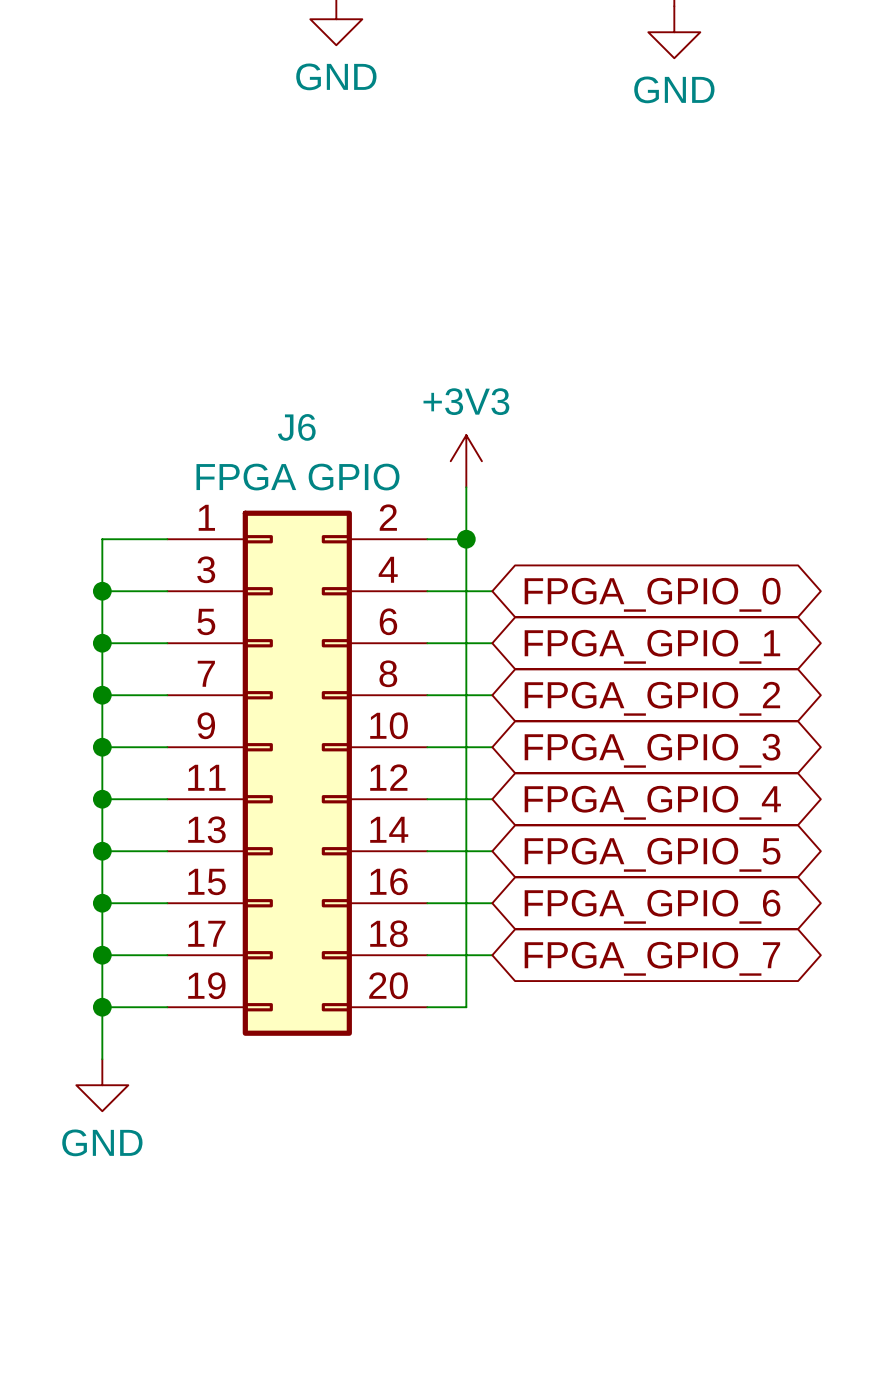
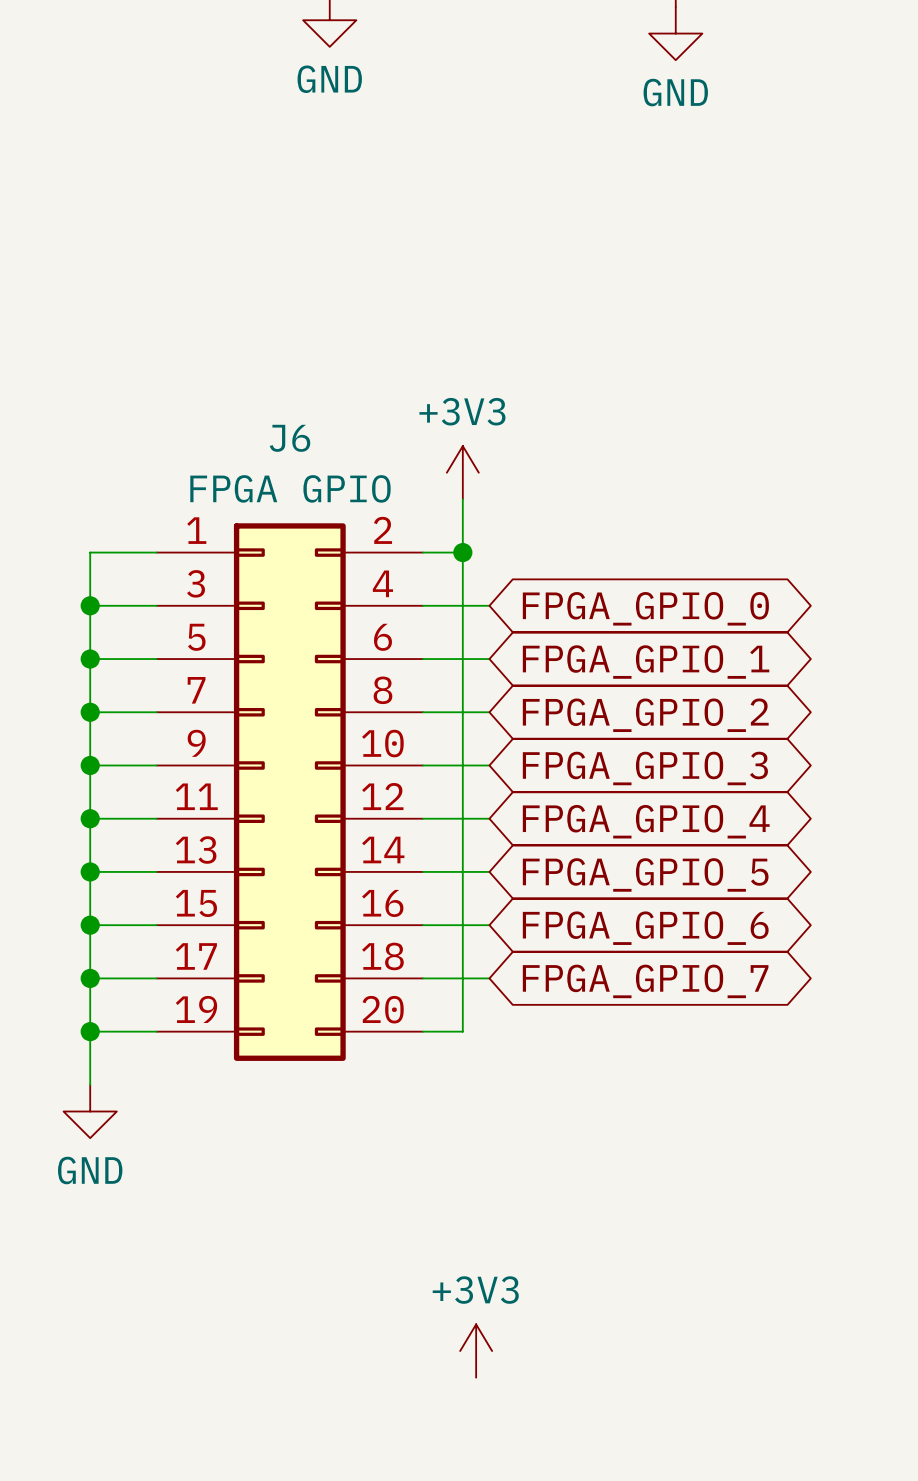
power symbol: none -> +3V3 (476, 1351)

